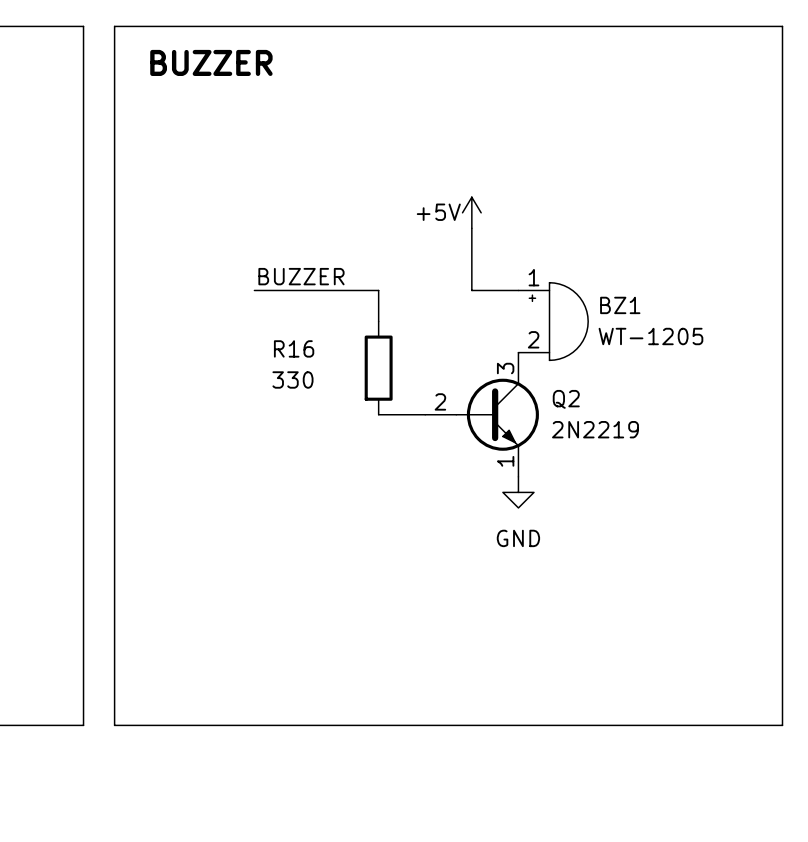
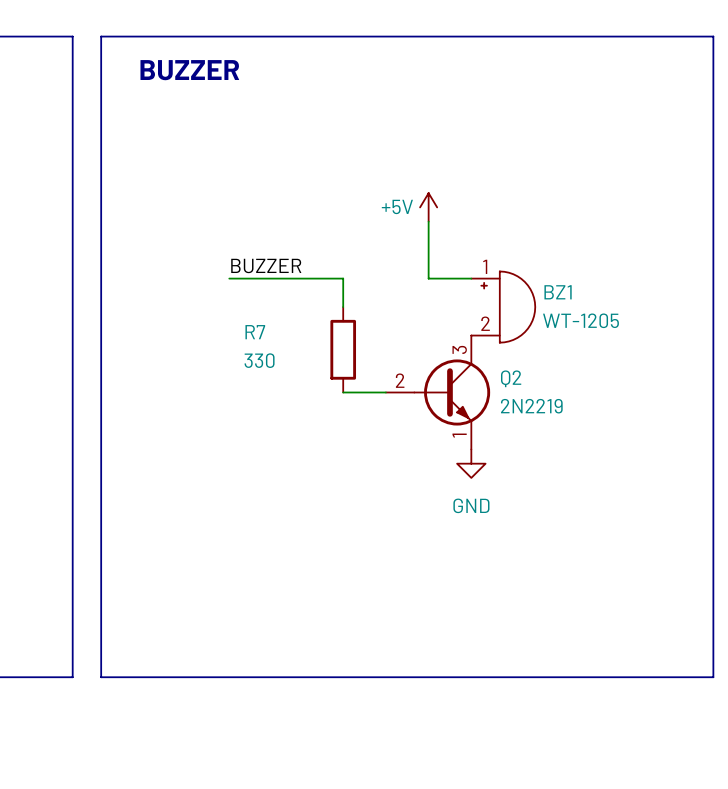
R16 name: R16 (294, 348) -> R7 (255, 332)

